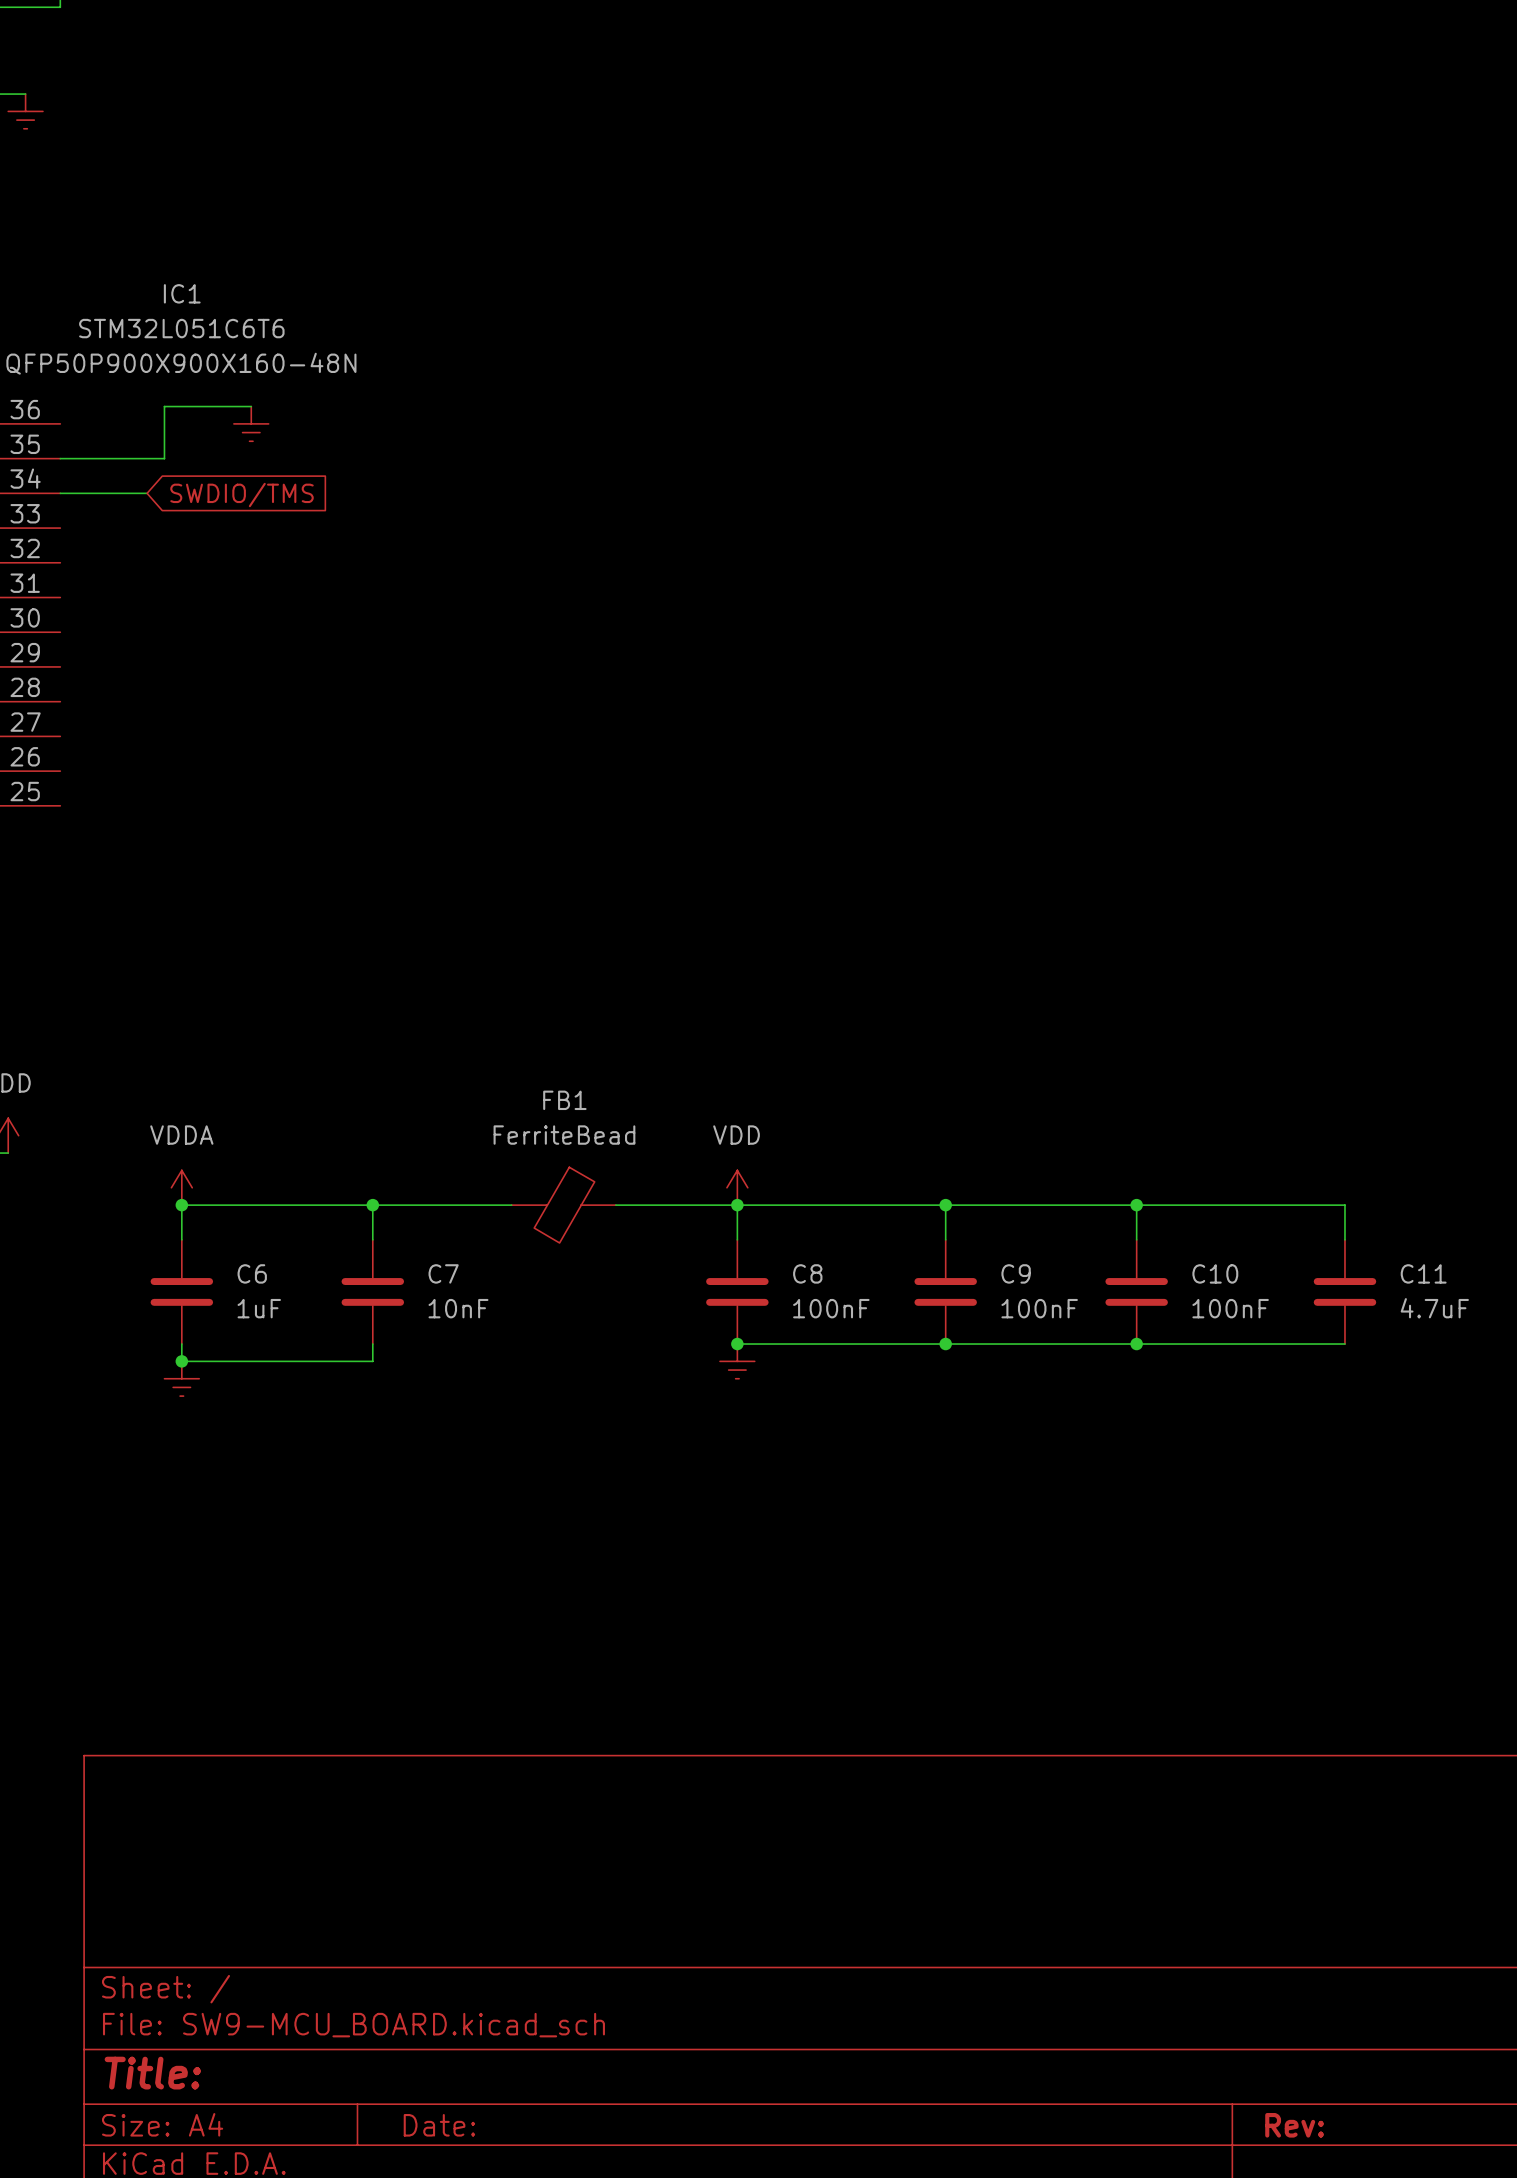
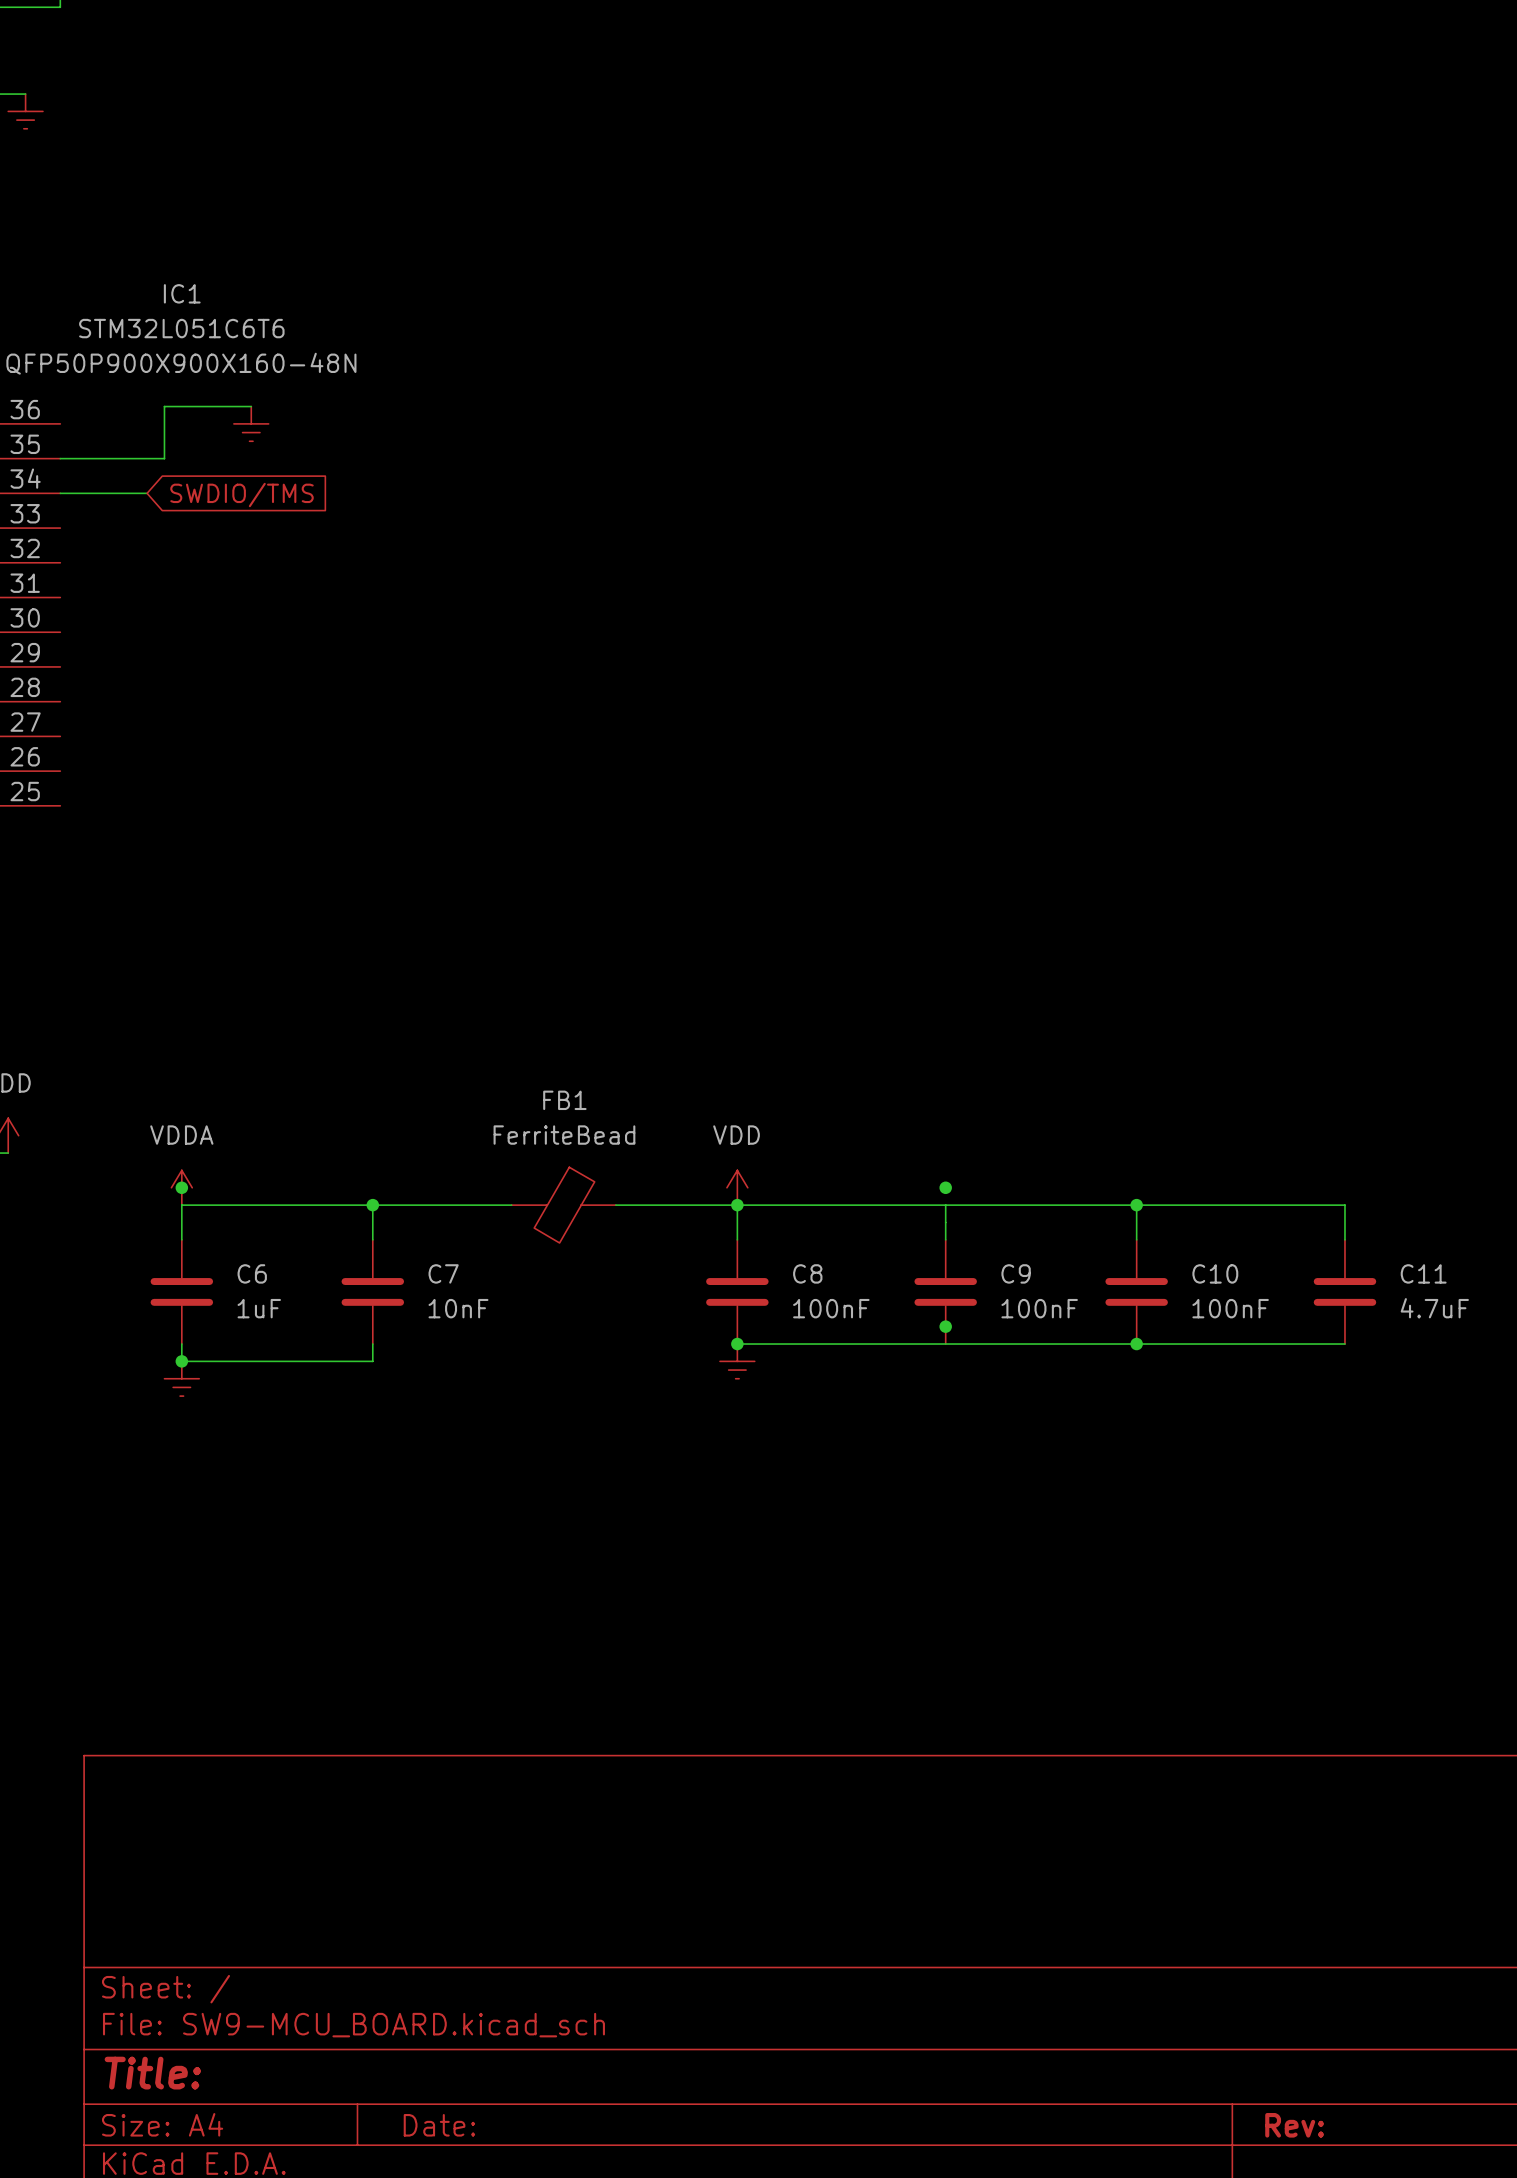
junction position: (181, 1205) -> (181, 1187)
junction position: (945, 1205) -> (945, 1187)
junction position: (945, 1344) -> (945, 1326)

